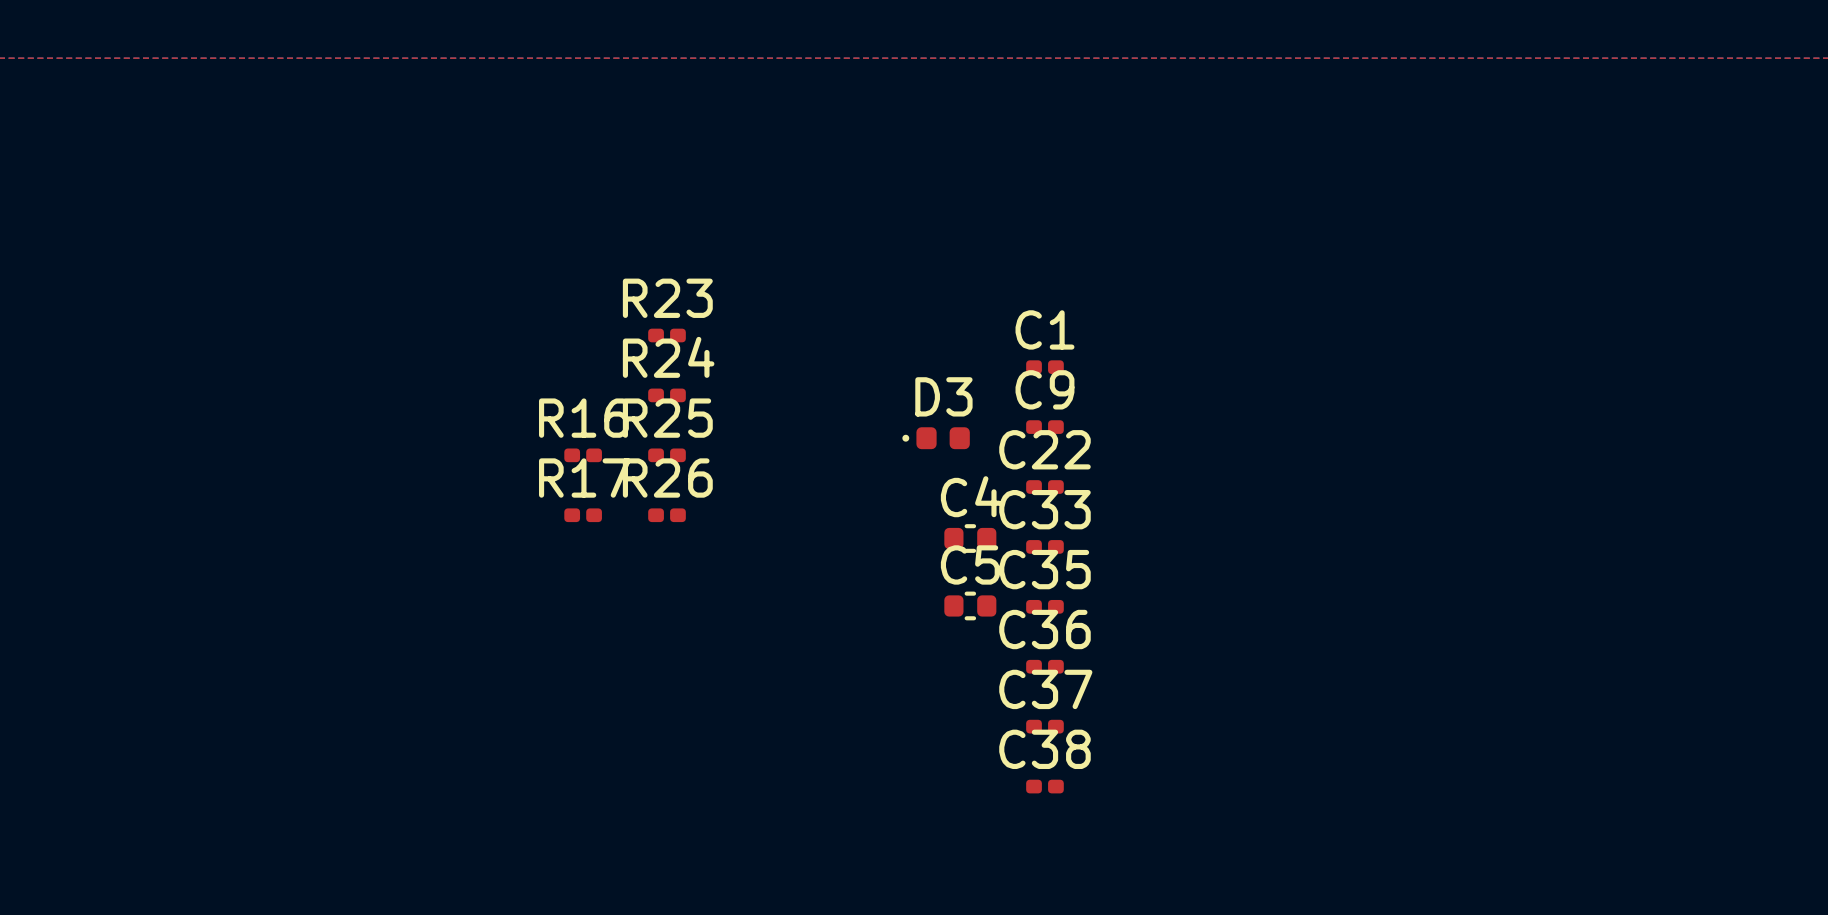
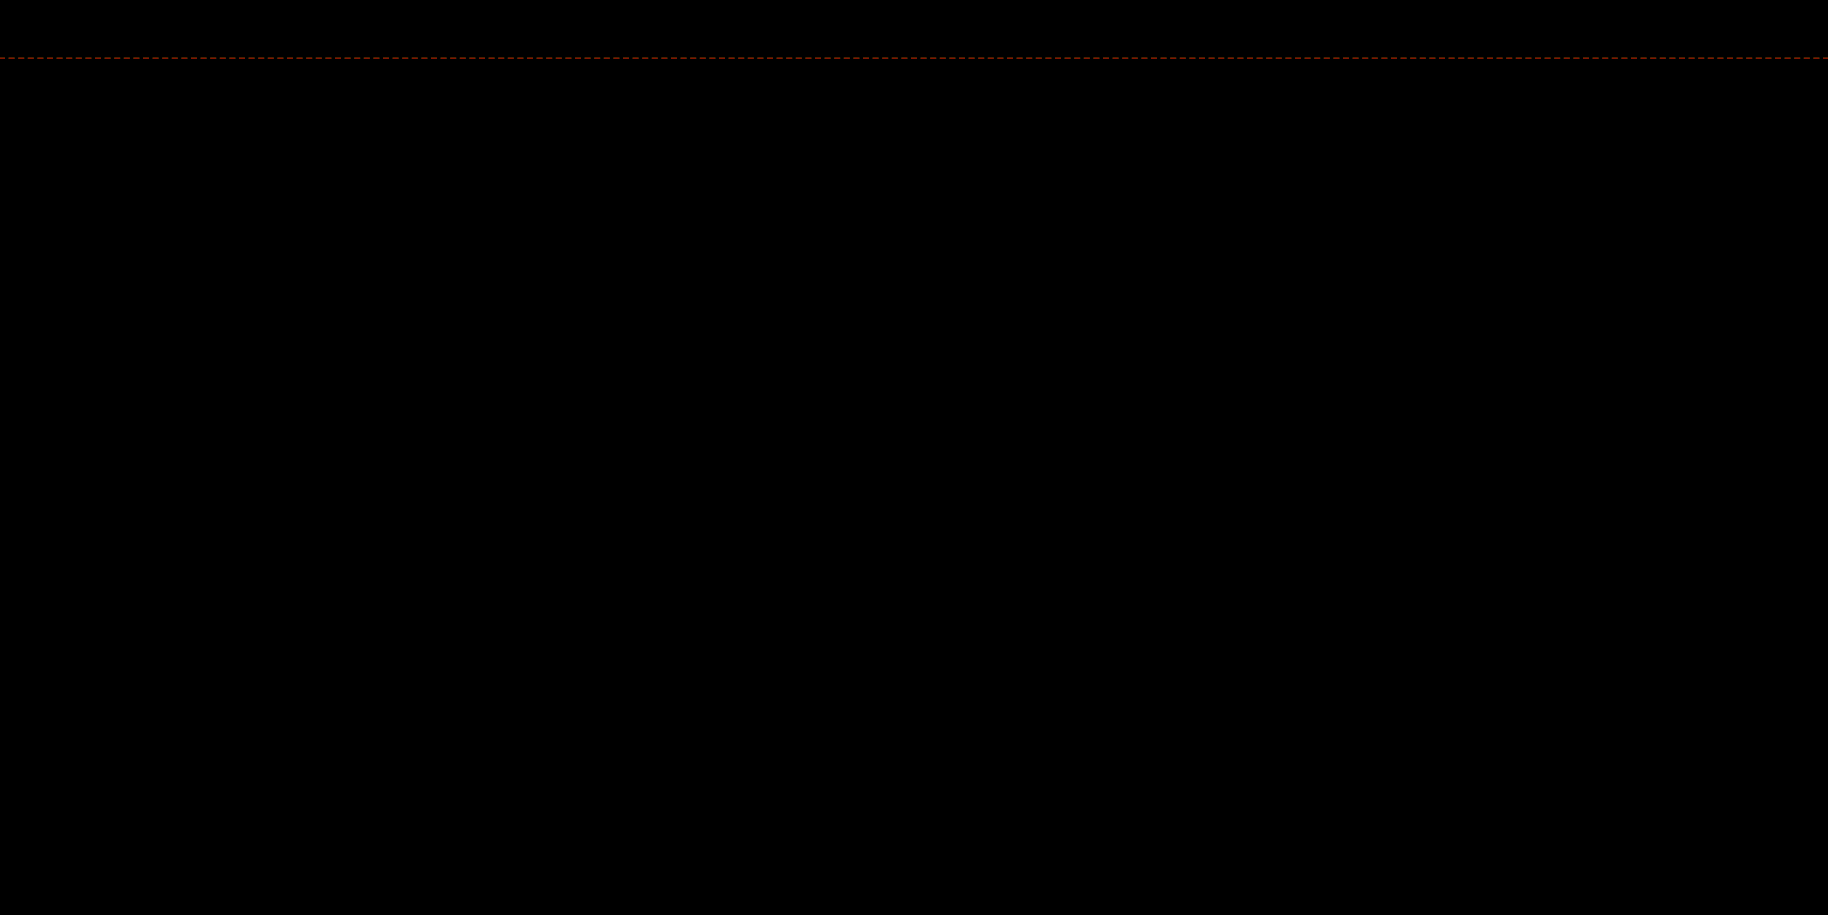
R23: (667, 335) -> none
C1: (1044, 367) -> none
R24: (667, 395) -> none
C9: (1044, 427) -> none
D3: (936, 438) -> none
R16: (583, 455) -> none
R25: (667, 455) -> none
C22: (1044, 486) -> none
R17: (583, 515) -> none
R26: (667, 515) -> none
C4: (970, 538) -> none
C33: (1044, 546) -> none
C5: (970, 605) -> none
C35: (1044, 606) -> none
C36: (1044, 666) -> none
C37: (1044, 726) -> none
C38: (1044, 786) -> none

